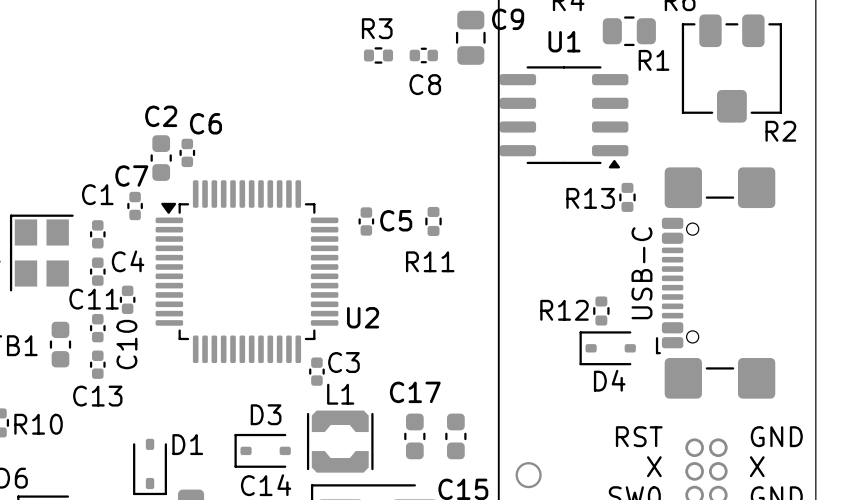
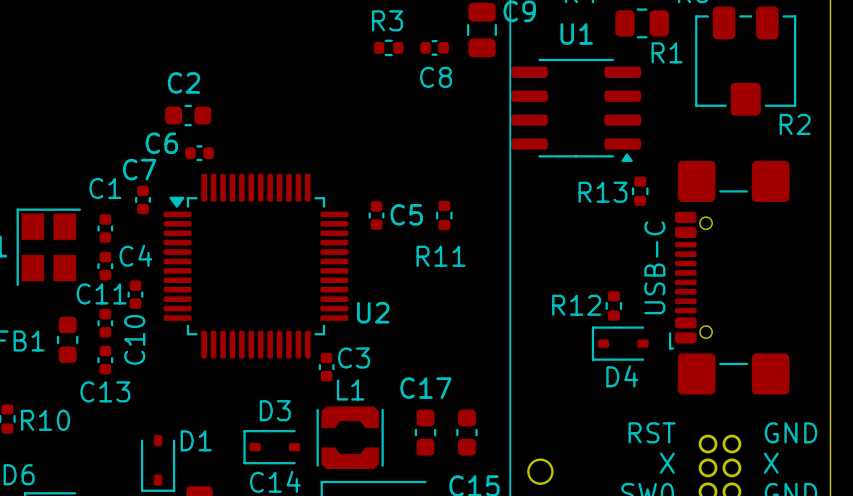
C6 name position: C6 (205, 123) -> C6 (161, 143)
C6 rotation: 0° (187, 152) -> 90° clockwise (199, 153)
C2 rotation: 0° (161, 158) -> 90° clockwise (188, 115)
C2 position: (161, 158) -> (188, 115)

